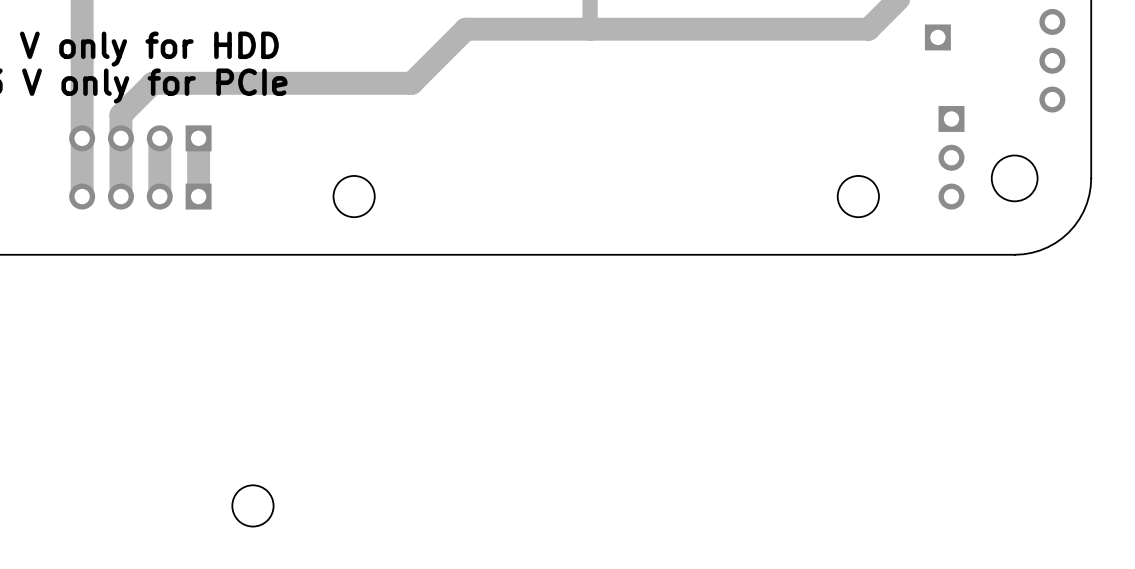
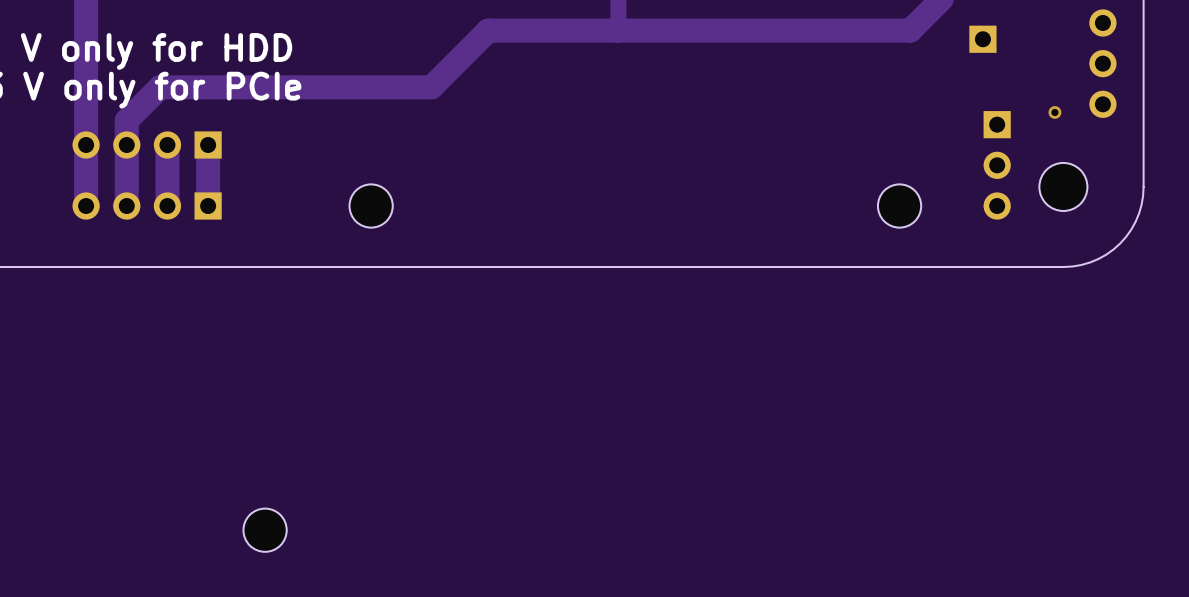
via: none -> (1054, 112)

